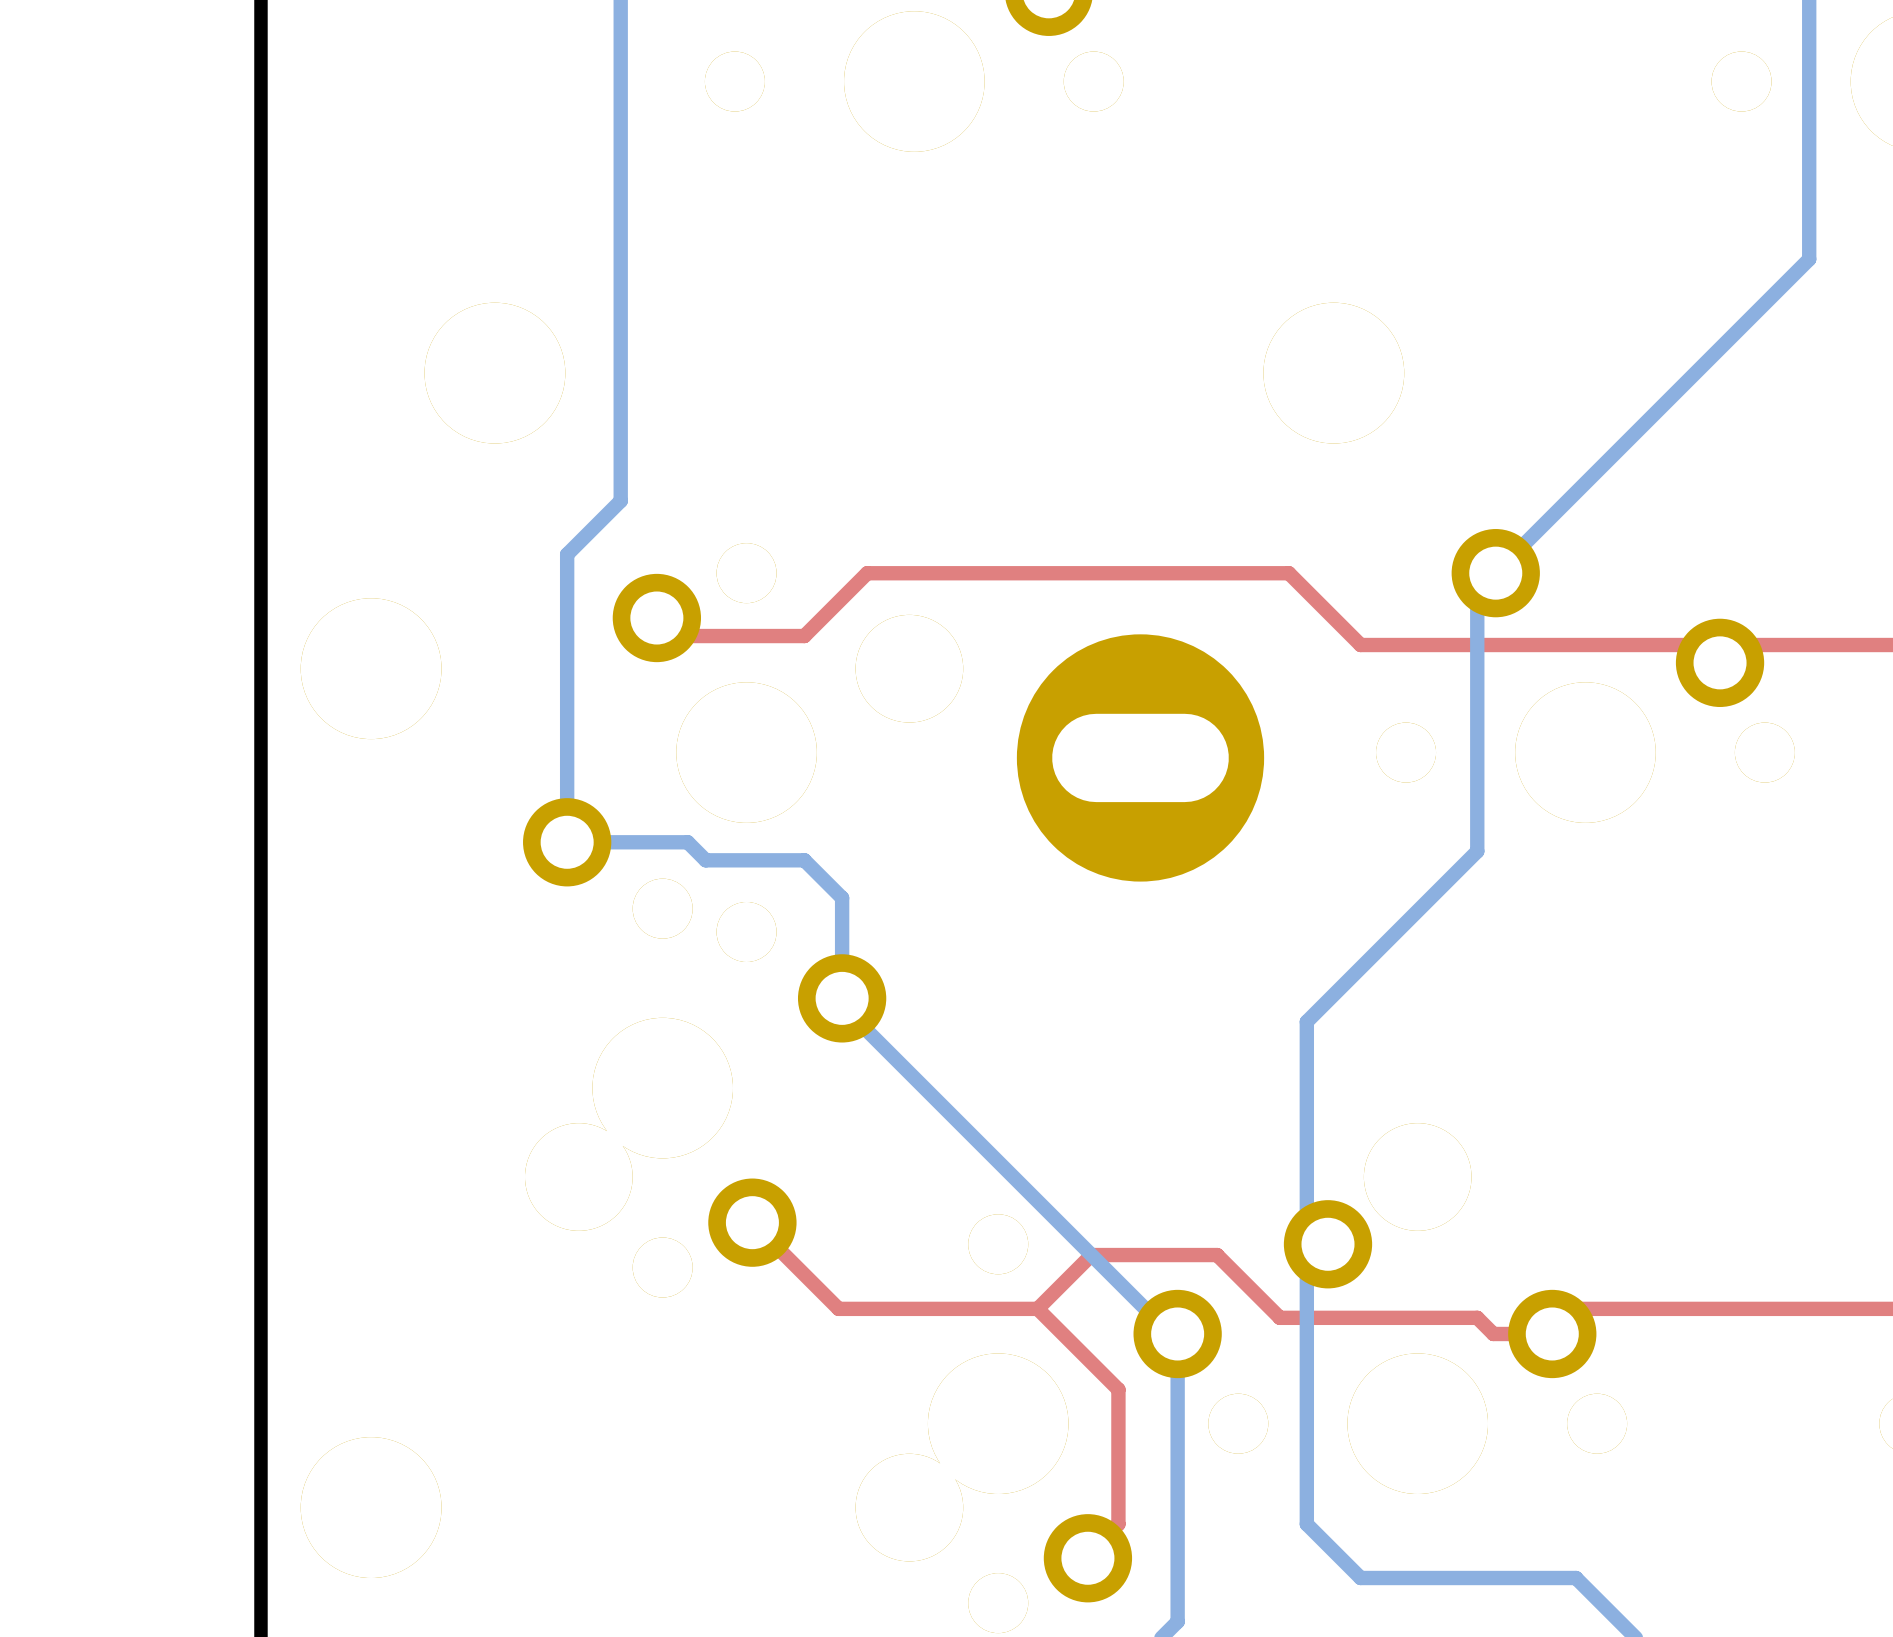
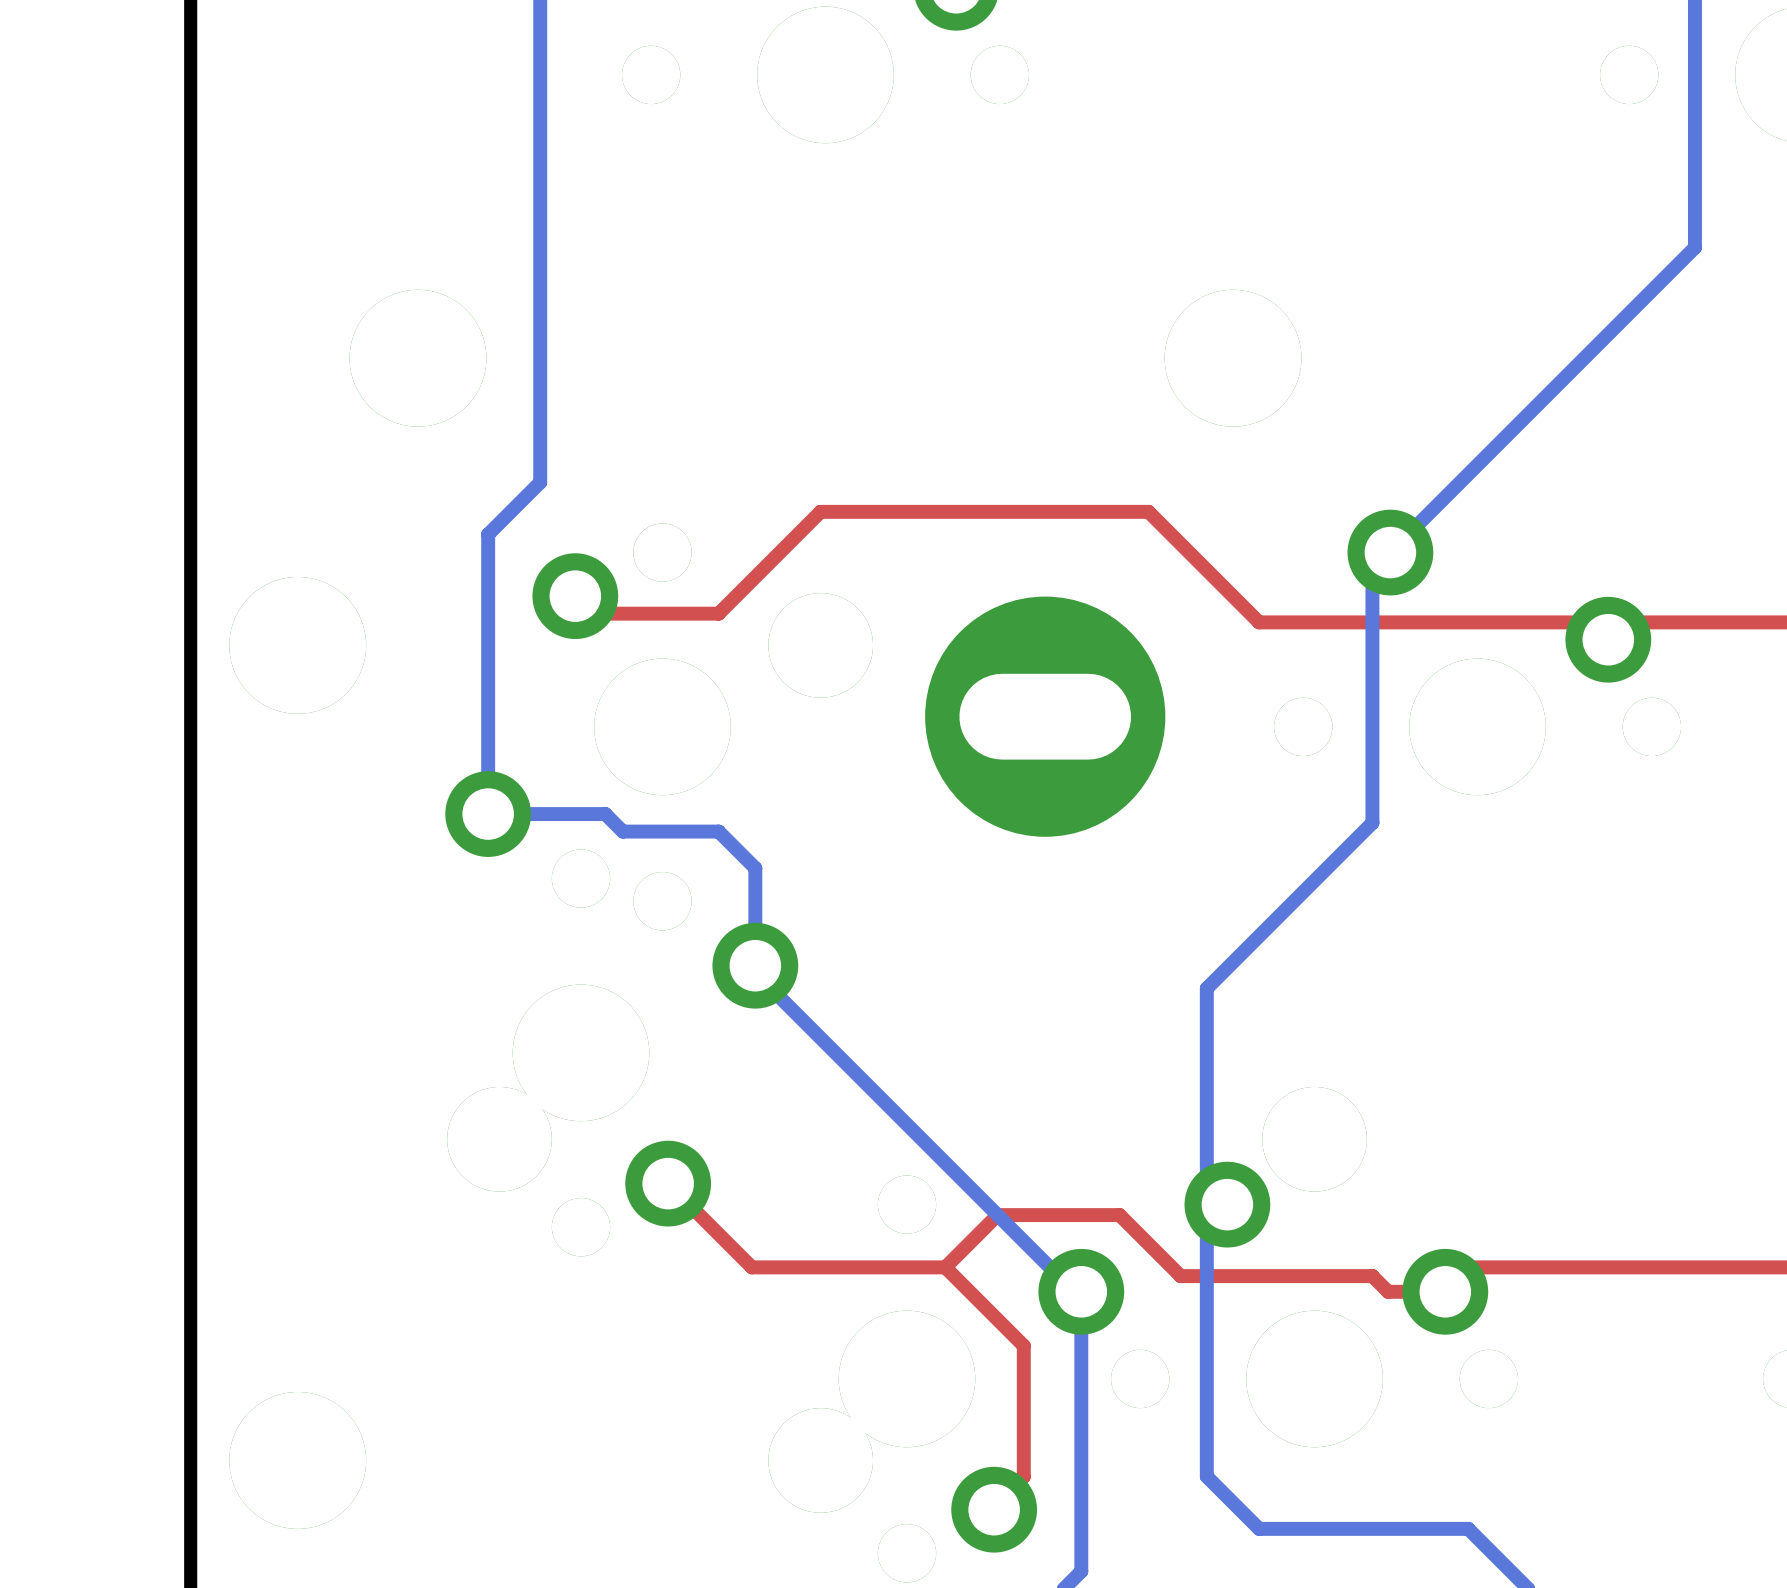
top track: (1288, 573) (867, 573) -> (1189, 552) (1148, 511) (820, 511) (779, 552)
part position: (1140, 757) -> (1045, 716)

